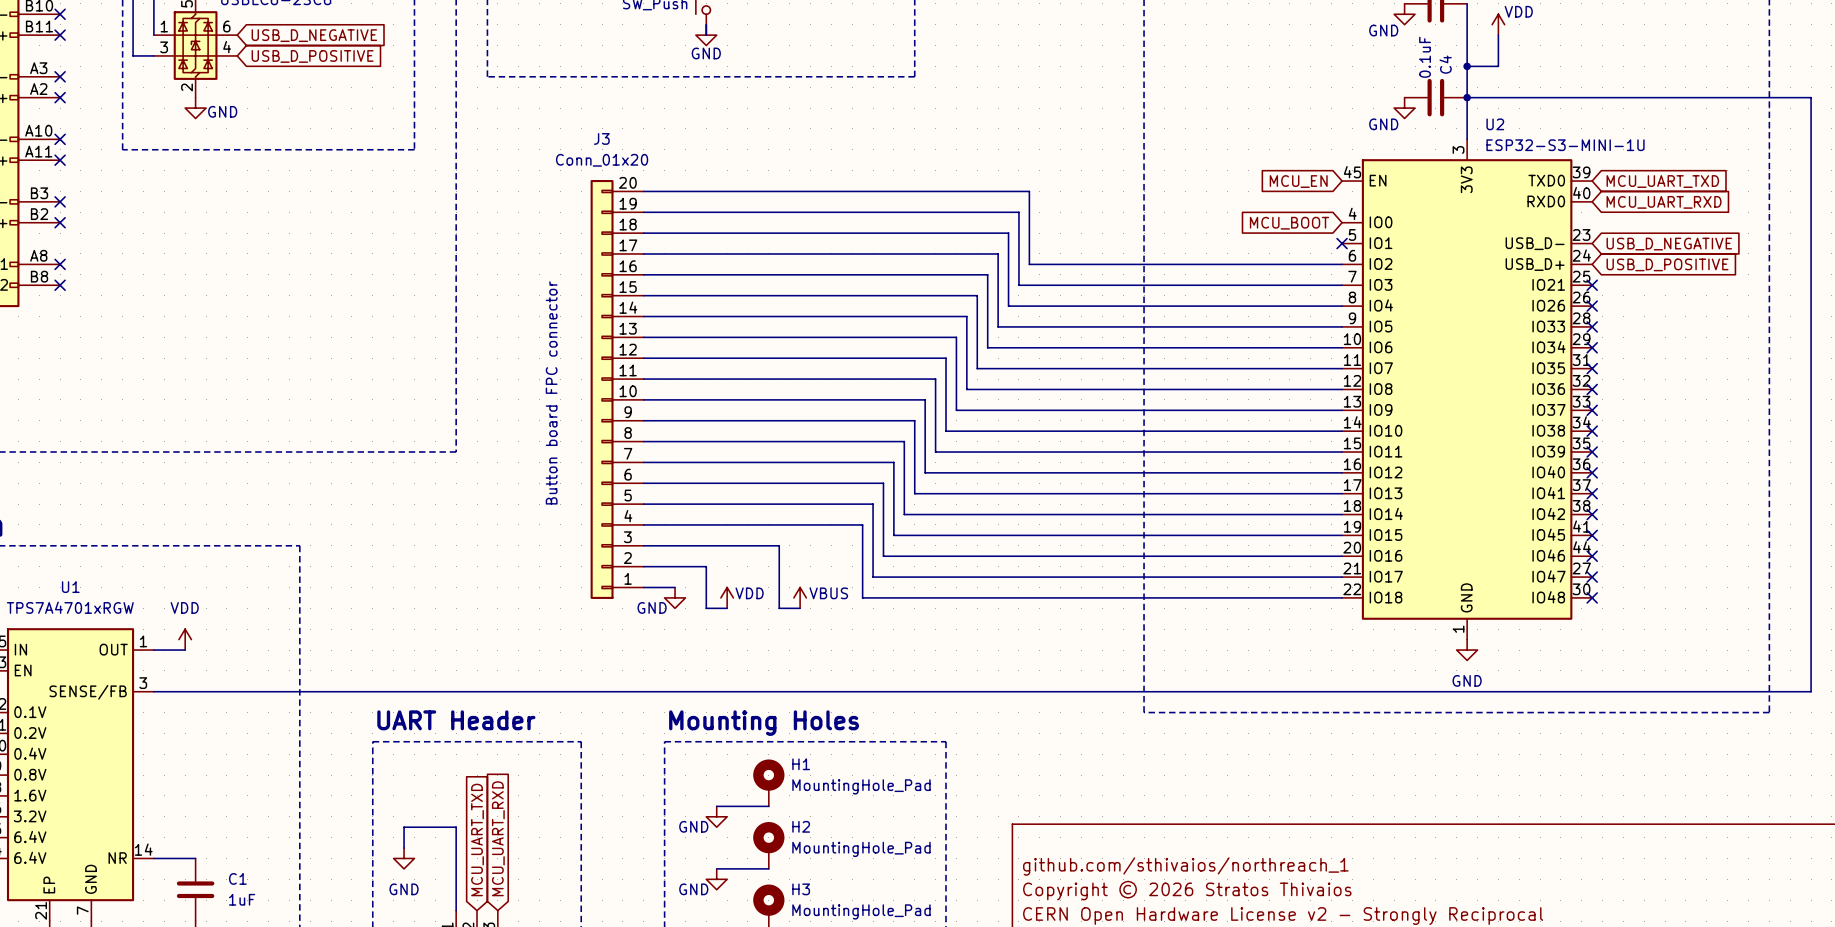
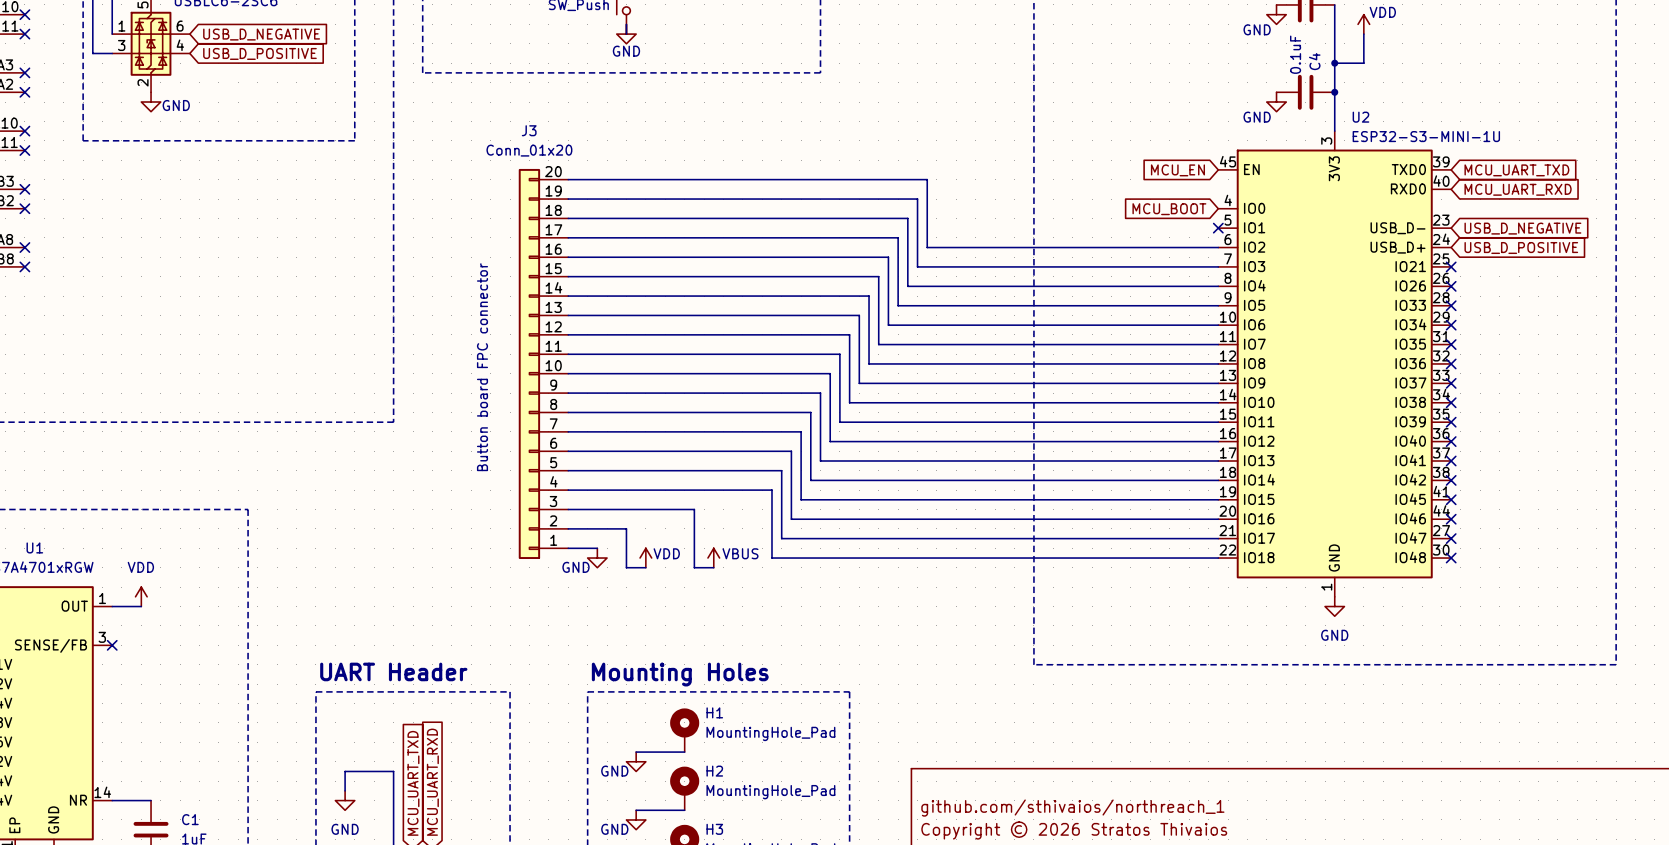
wire: (1467, 97) (1811, 97) (1811, 691) (153, 691) -> none
no-connect mark: none -> (112, 645)

